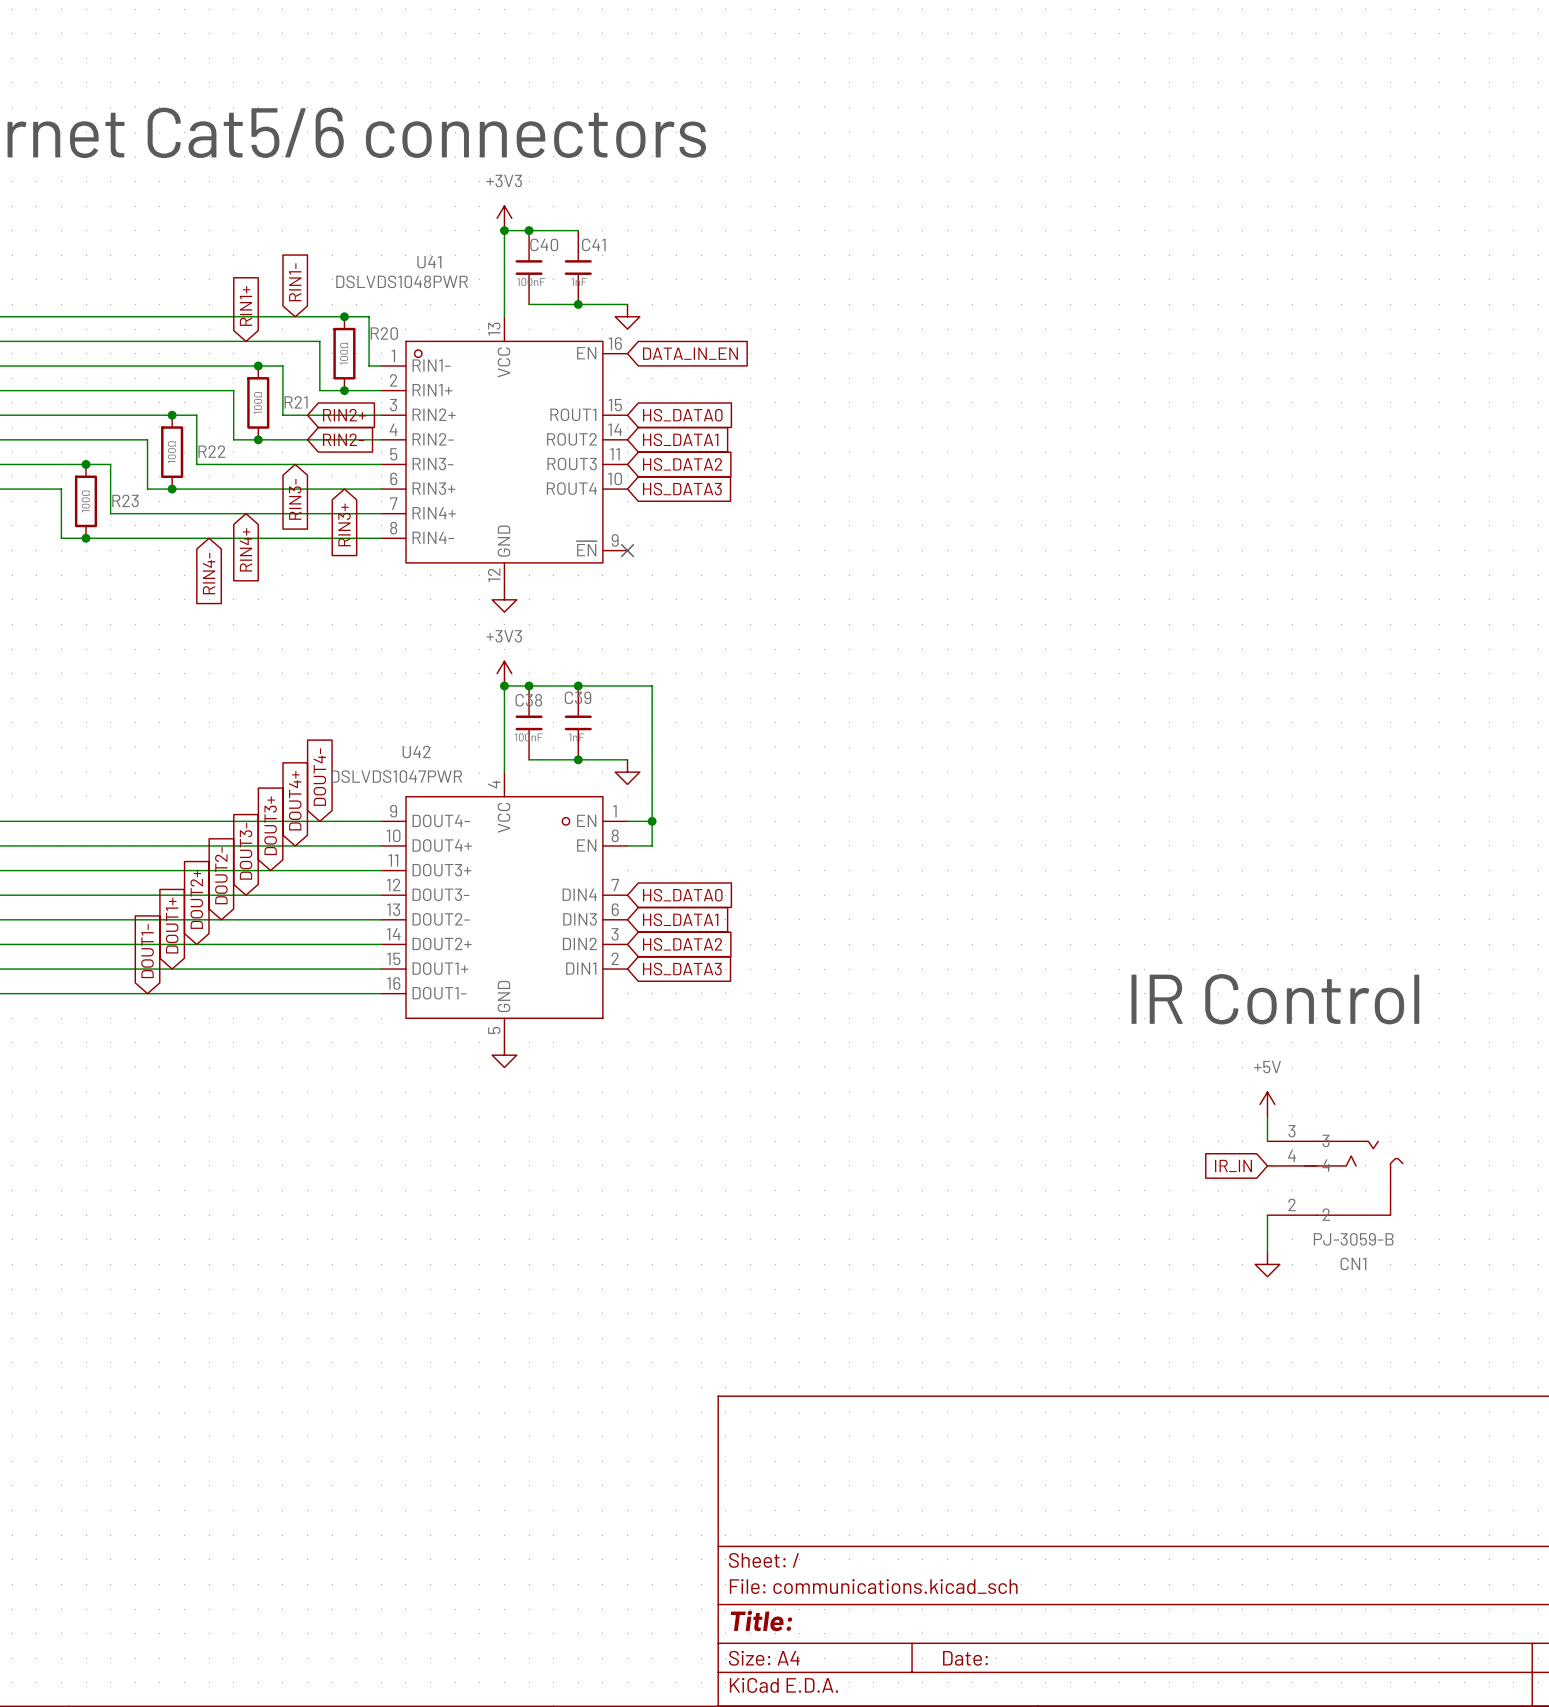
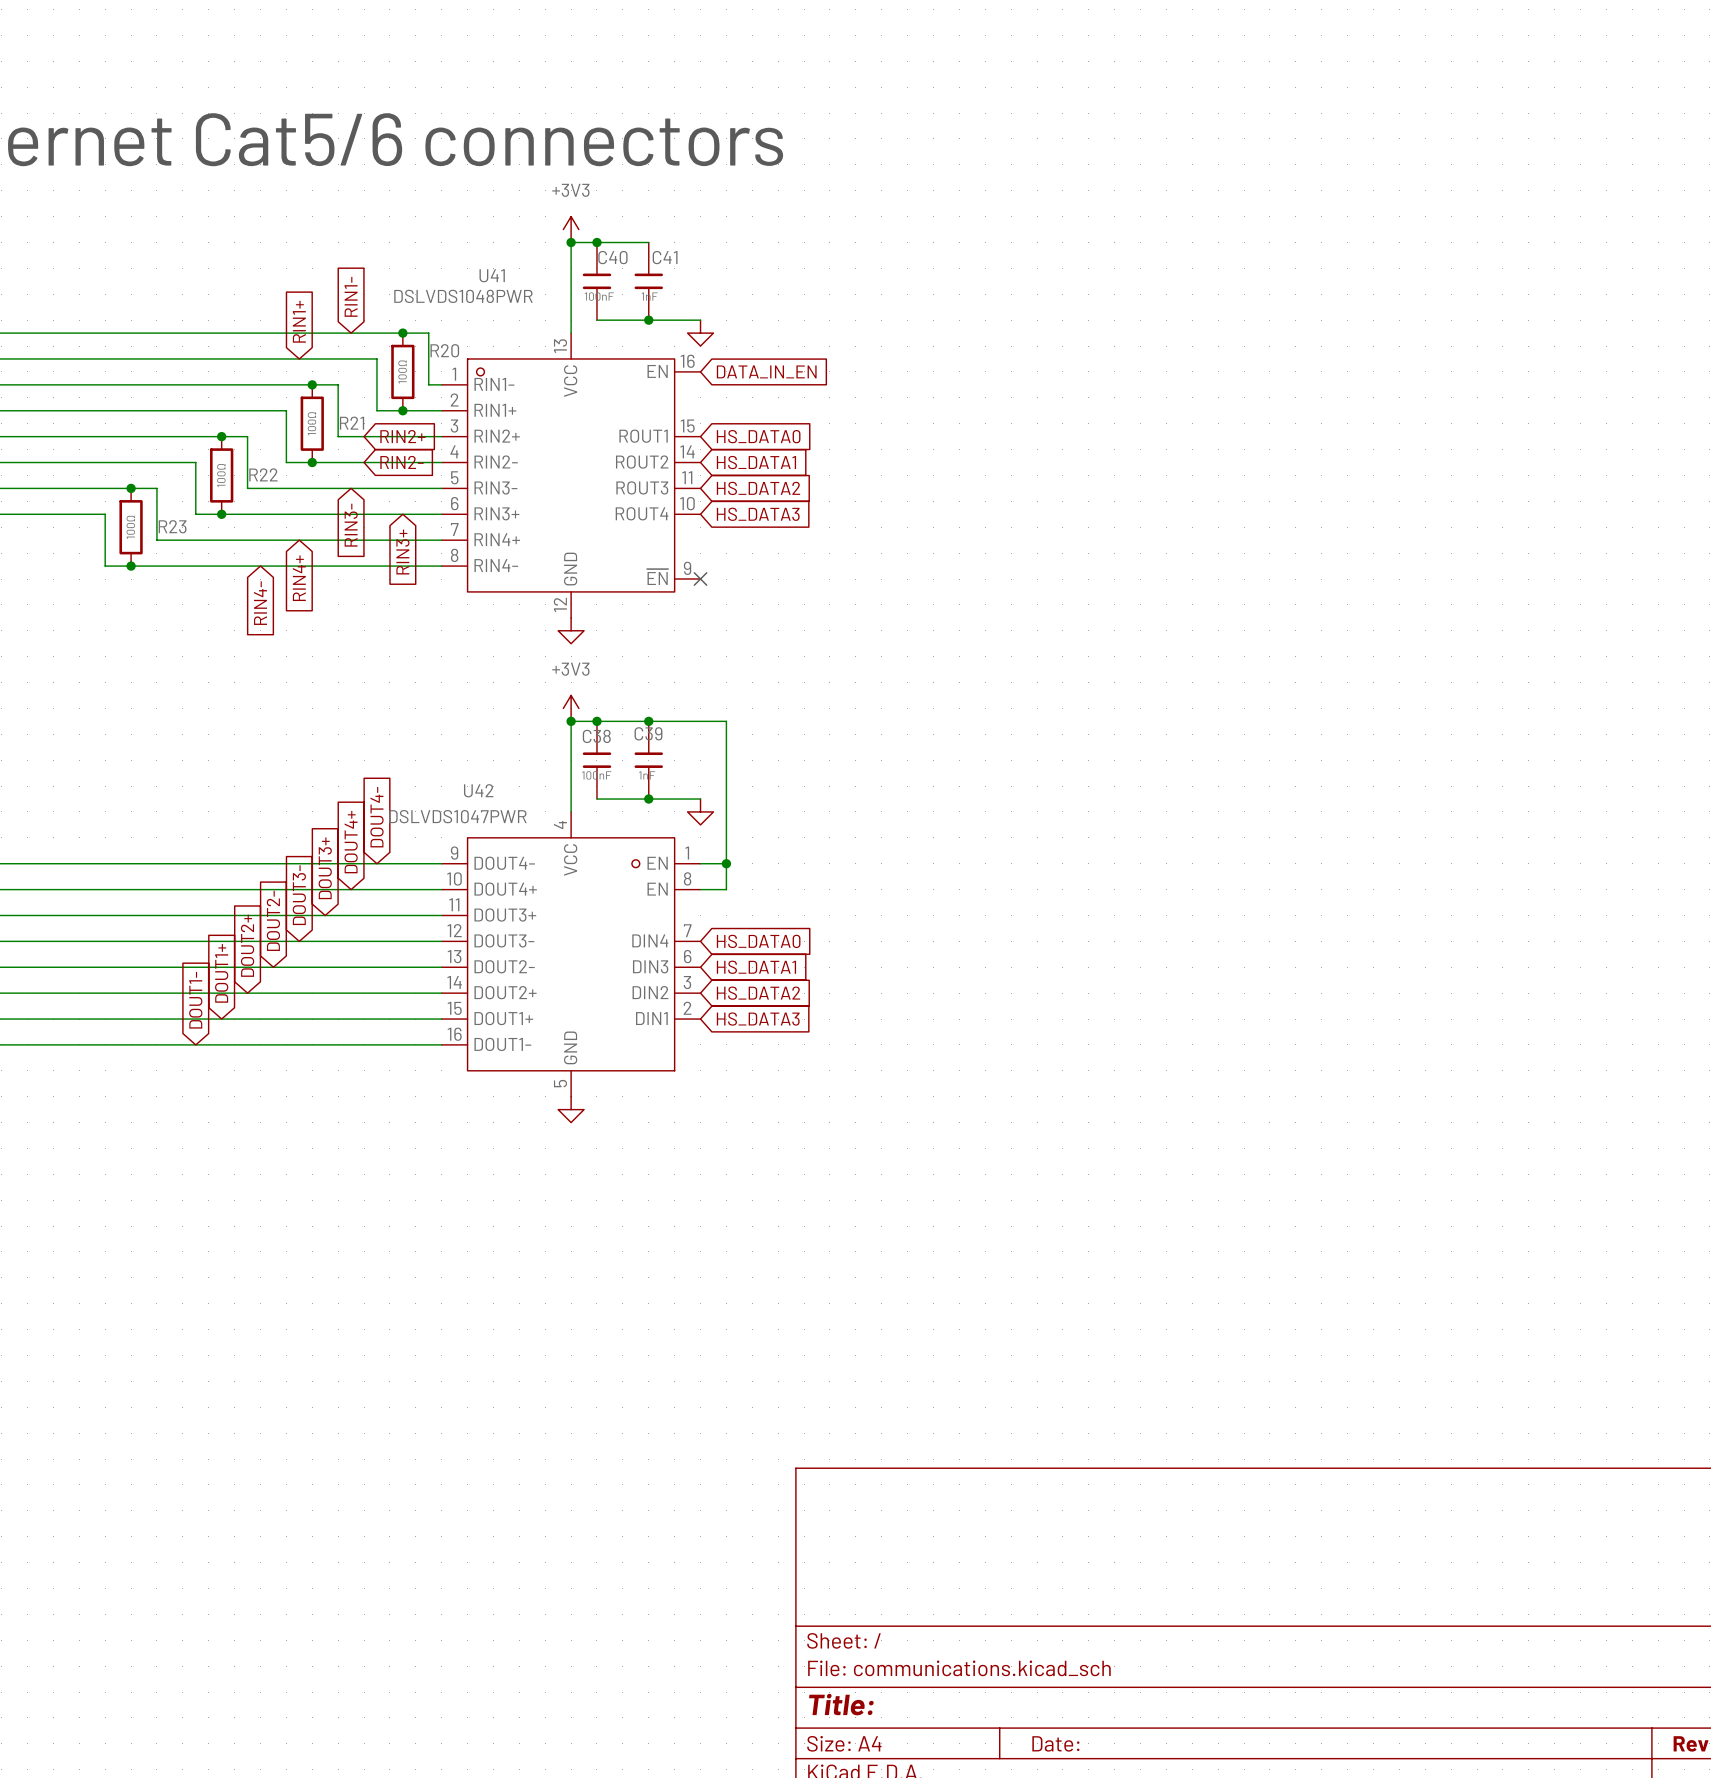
text: IR Control (1275, 999) -> none
power symbol: +5V (1267, 1104) -> none
wire: (1267, 1116) (1267, 1141) -> none
global label: IR_IN (1233, 1165) -> none
CN1: PJ-3059-B (1335, 1178) -> none
wire: (1267, 1215) (1267, 1252) -> none
power symbol: (1267, 1264) -> none

